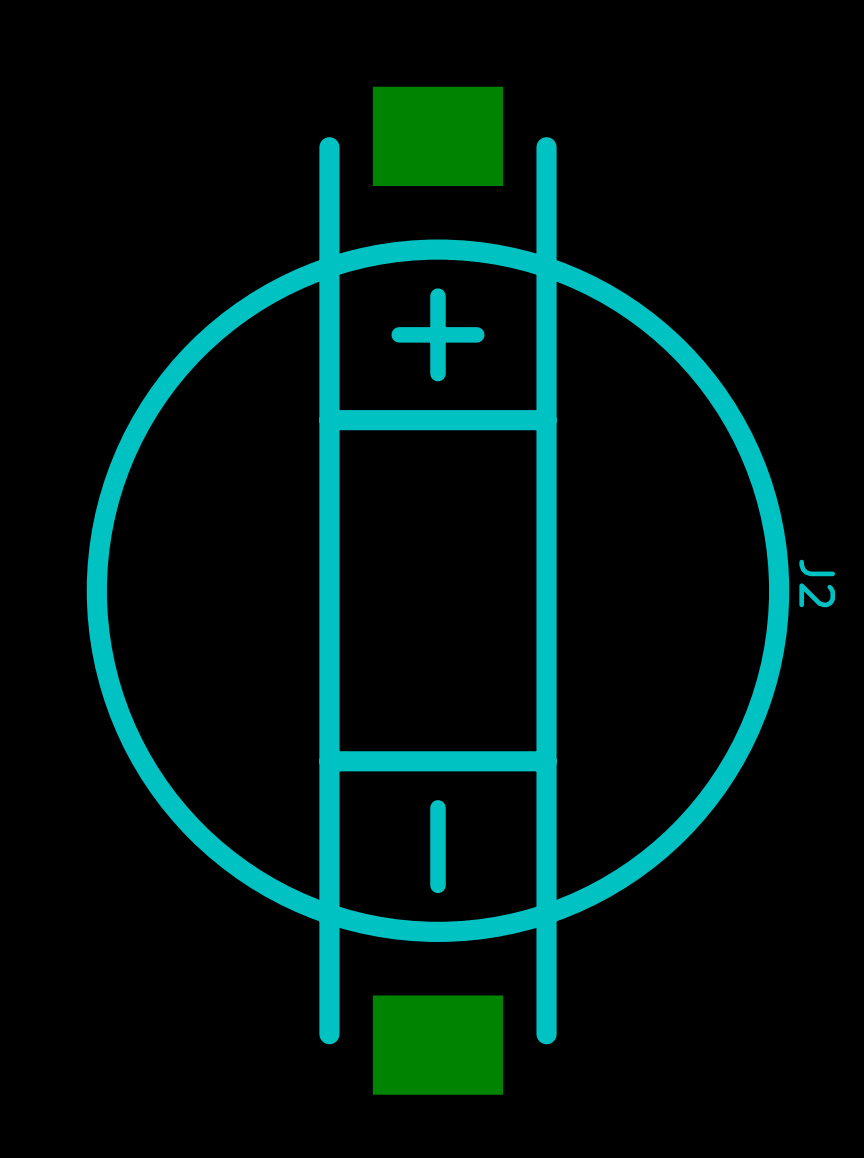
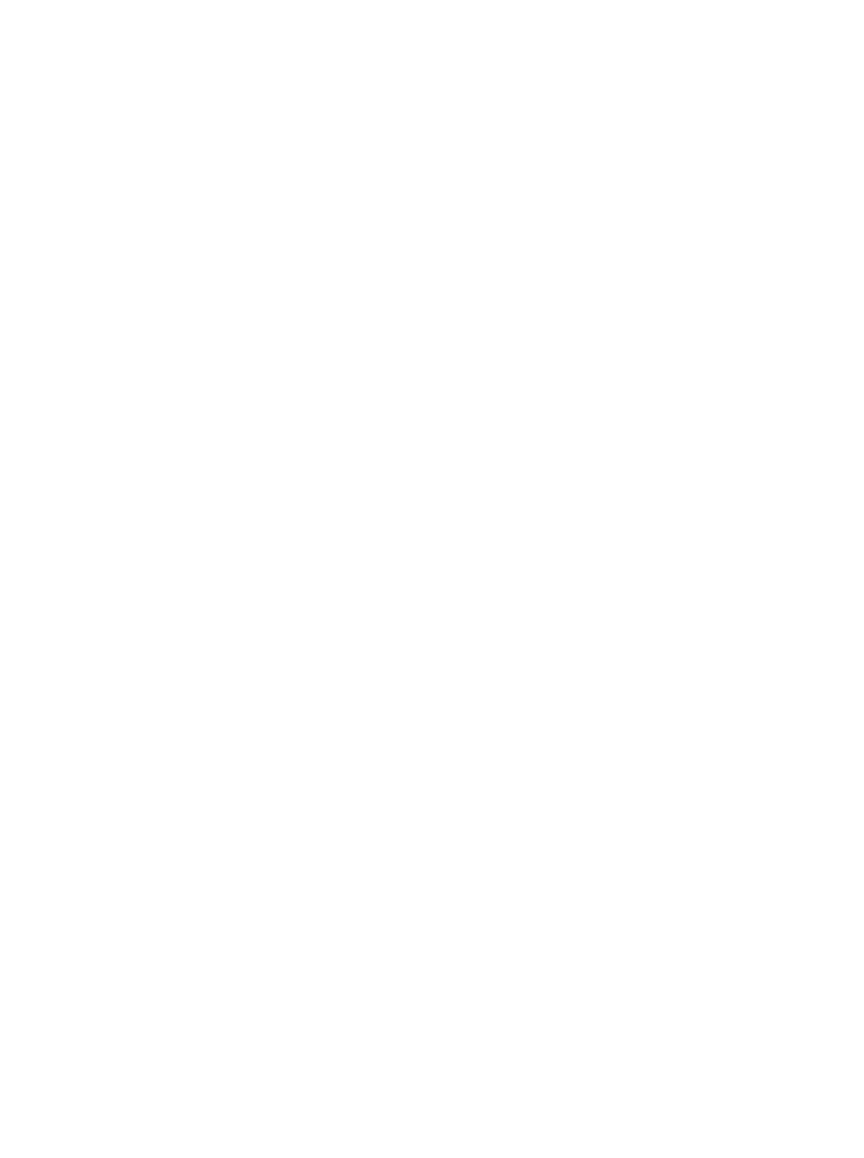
J2: (437, 590) -> none

